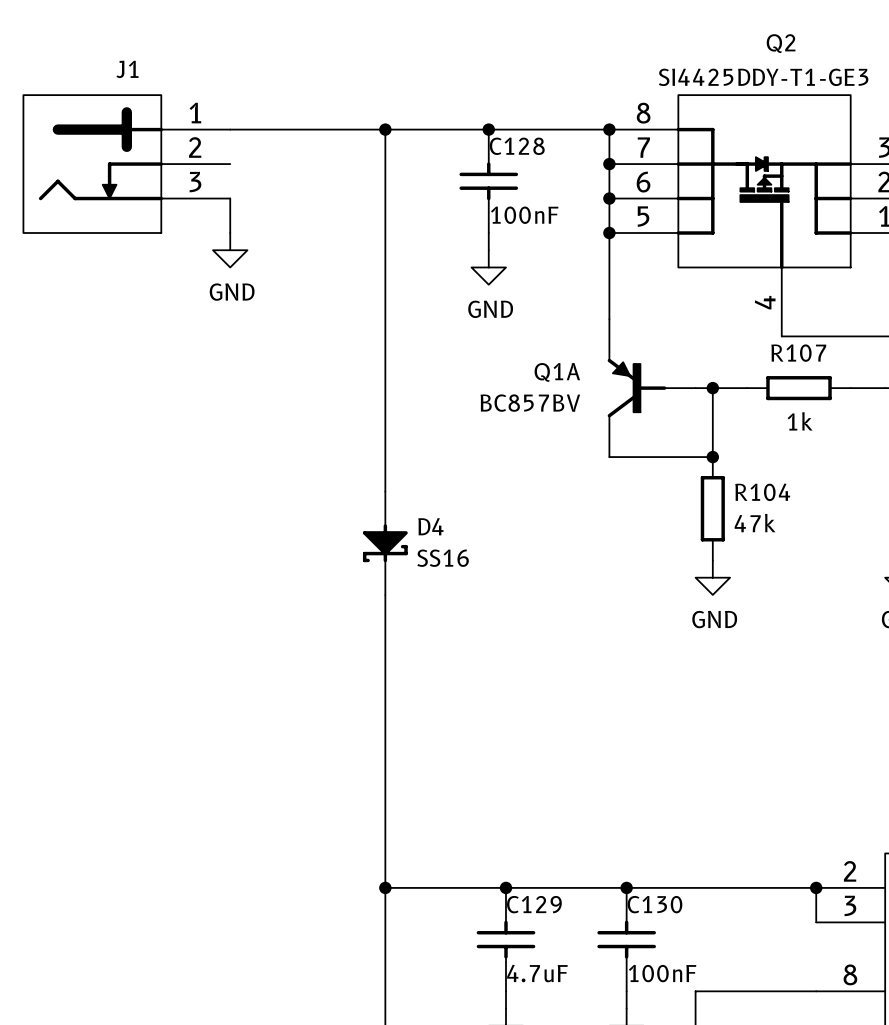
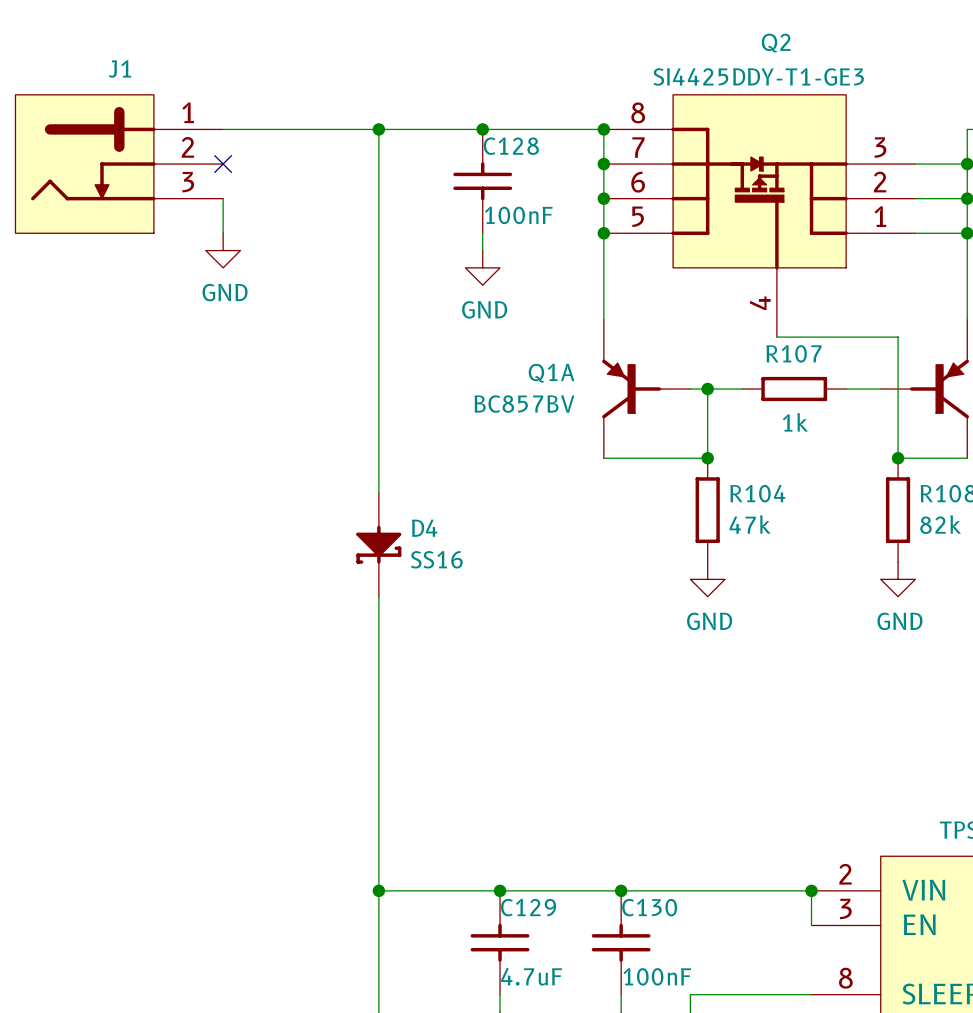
no-connect mark: none -> (223, 164)

